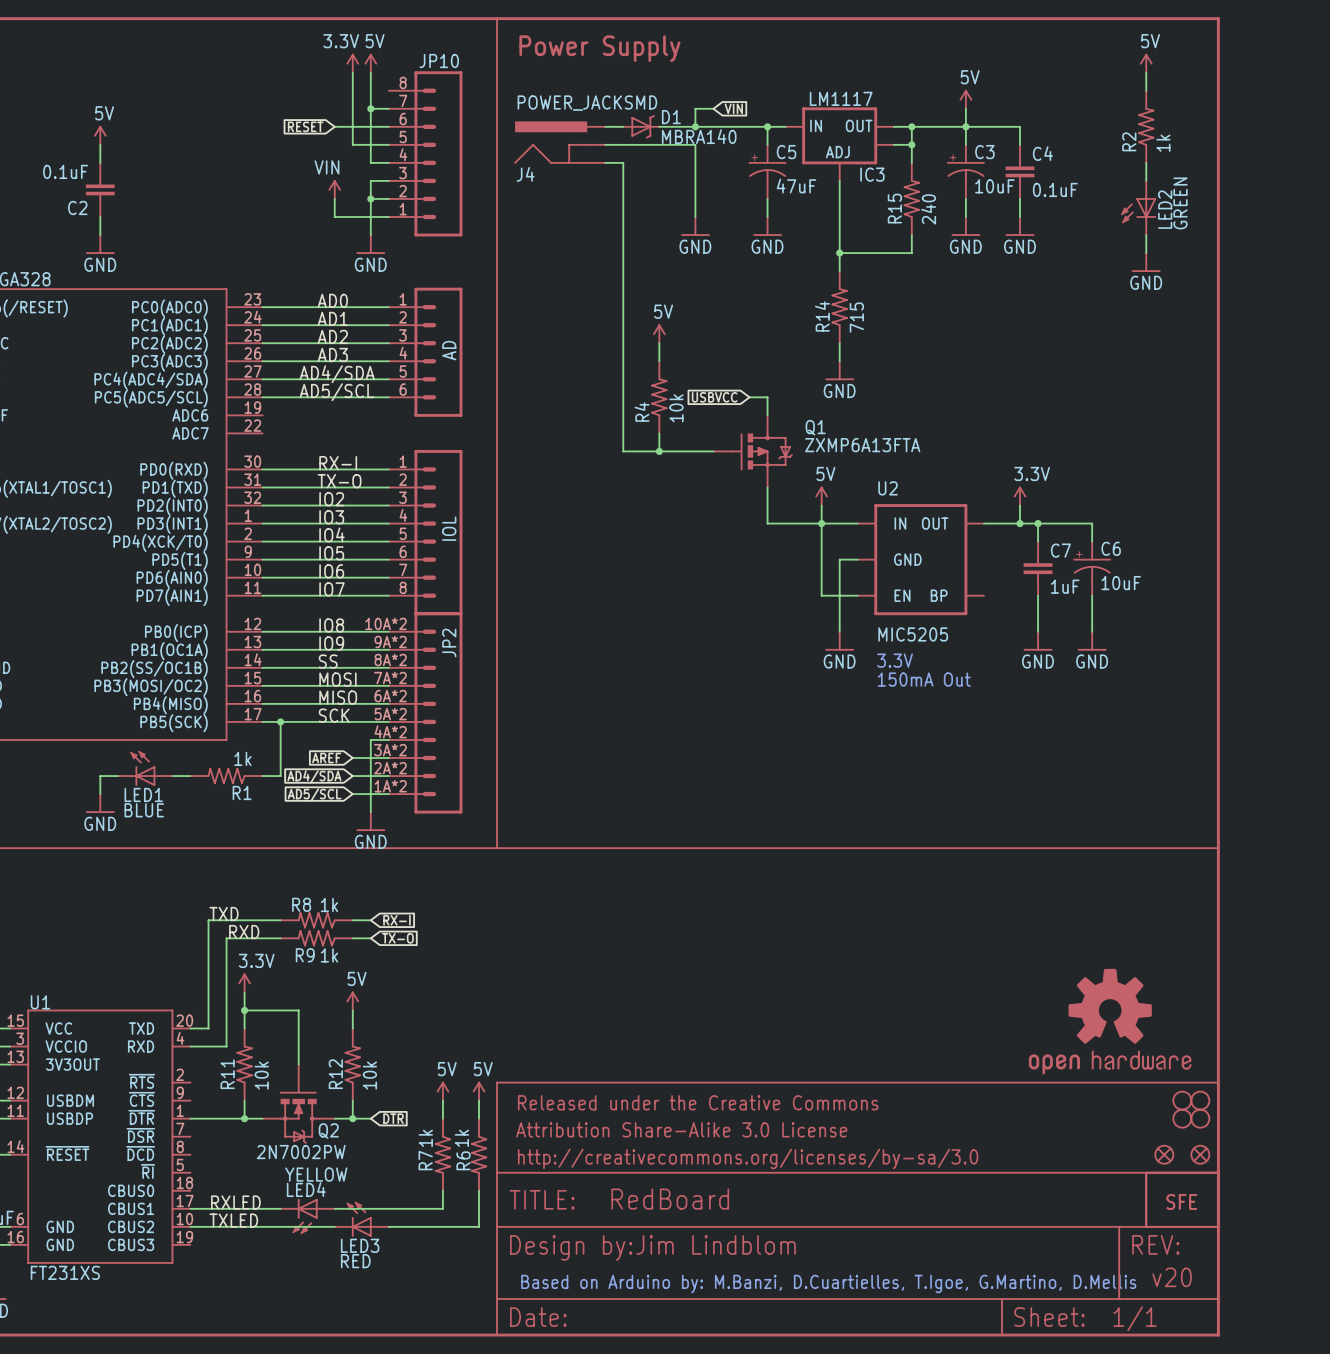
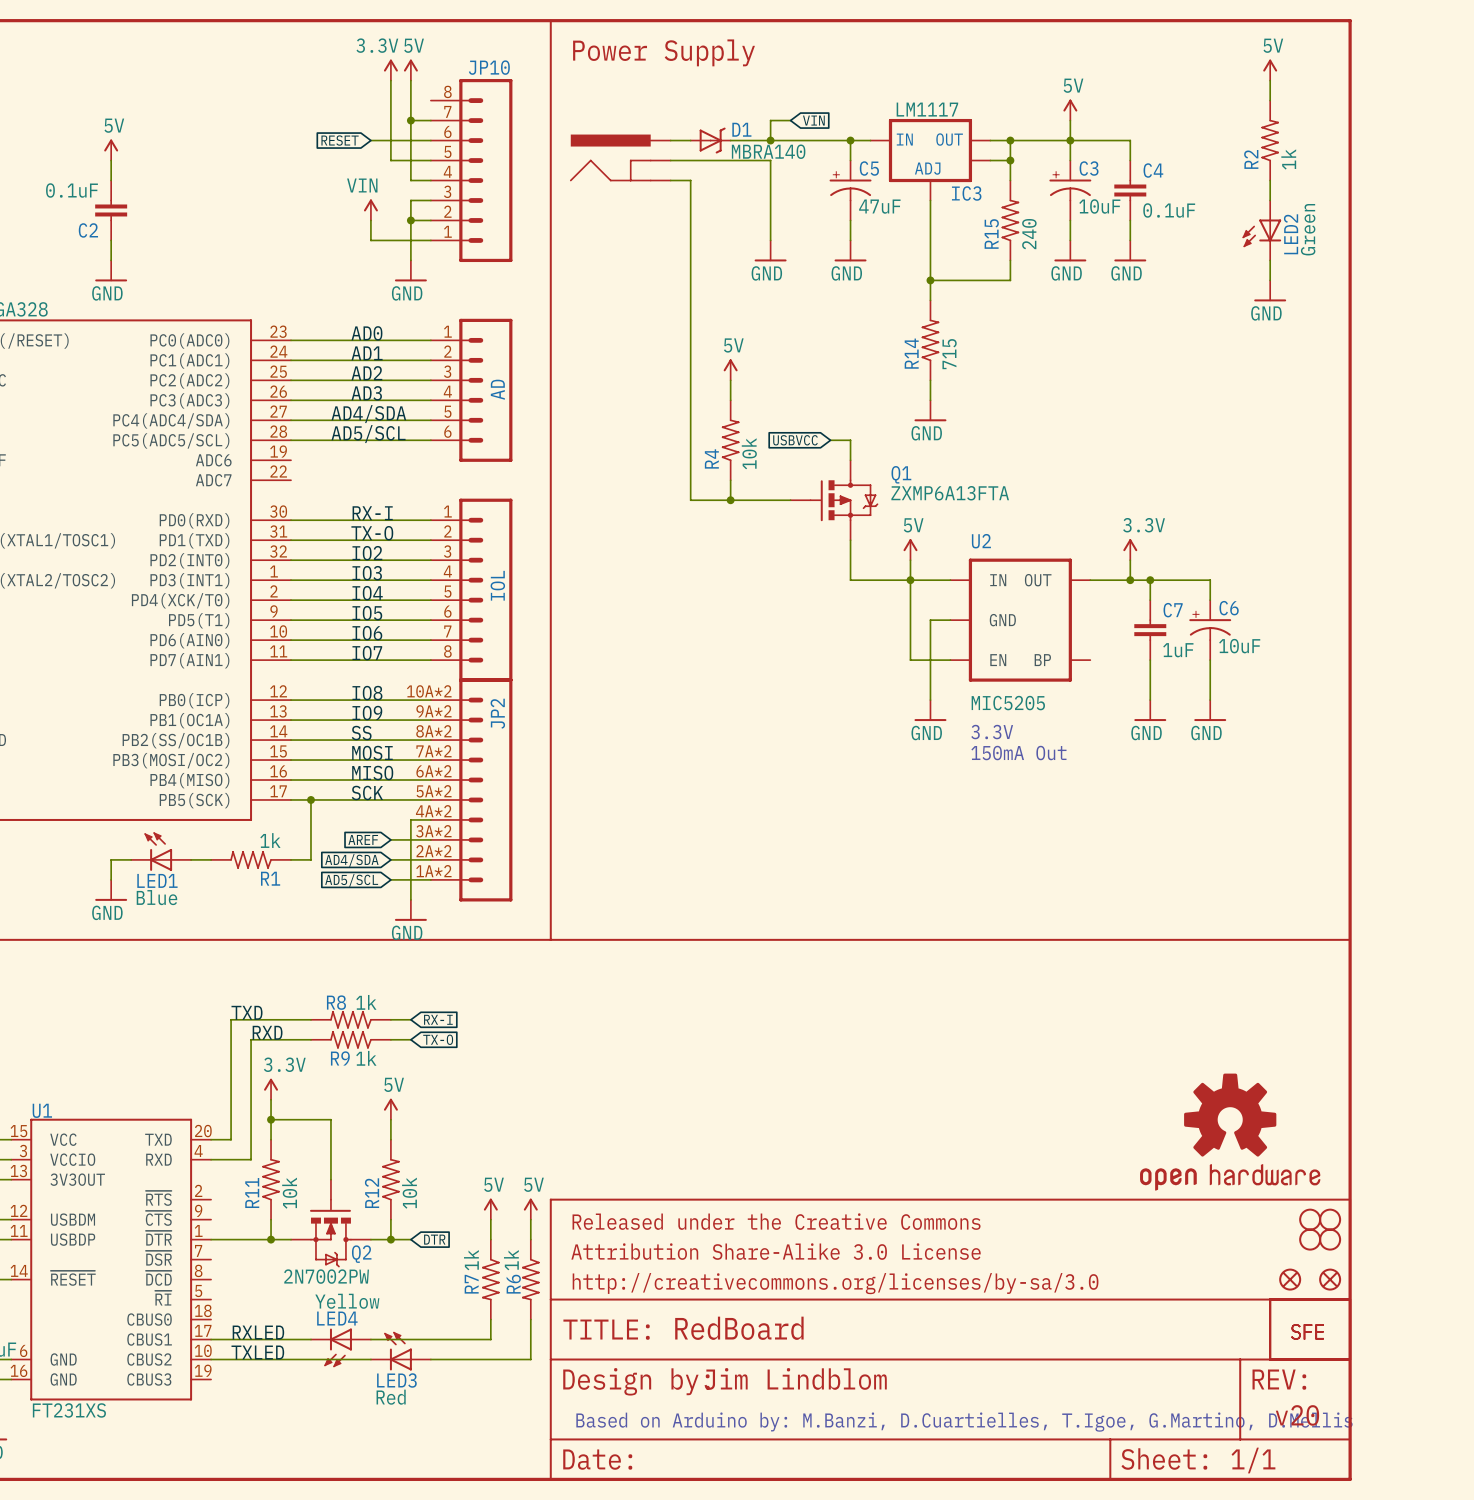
J4 value: POWER_JACKSMD (587, 103) -> none
J4 name: J4 (525, 174) -> none
LED2 value: GREEN (1180, 203) -> Green (1308, 229)
LED1 value: BLUE (144, 810) -> Blue (156, 897)
LED4 value: YELLOW (316, 1174) -> Yellow (347, 1301)
LED3 value: RED (355, 1261) -> Red (391, 1397)

